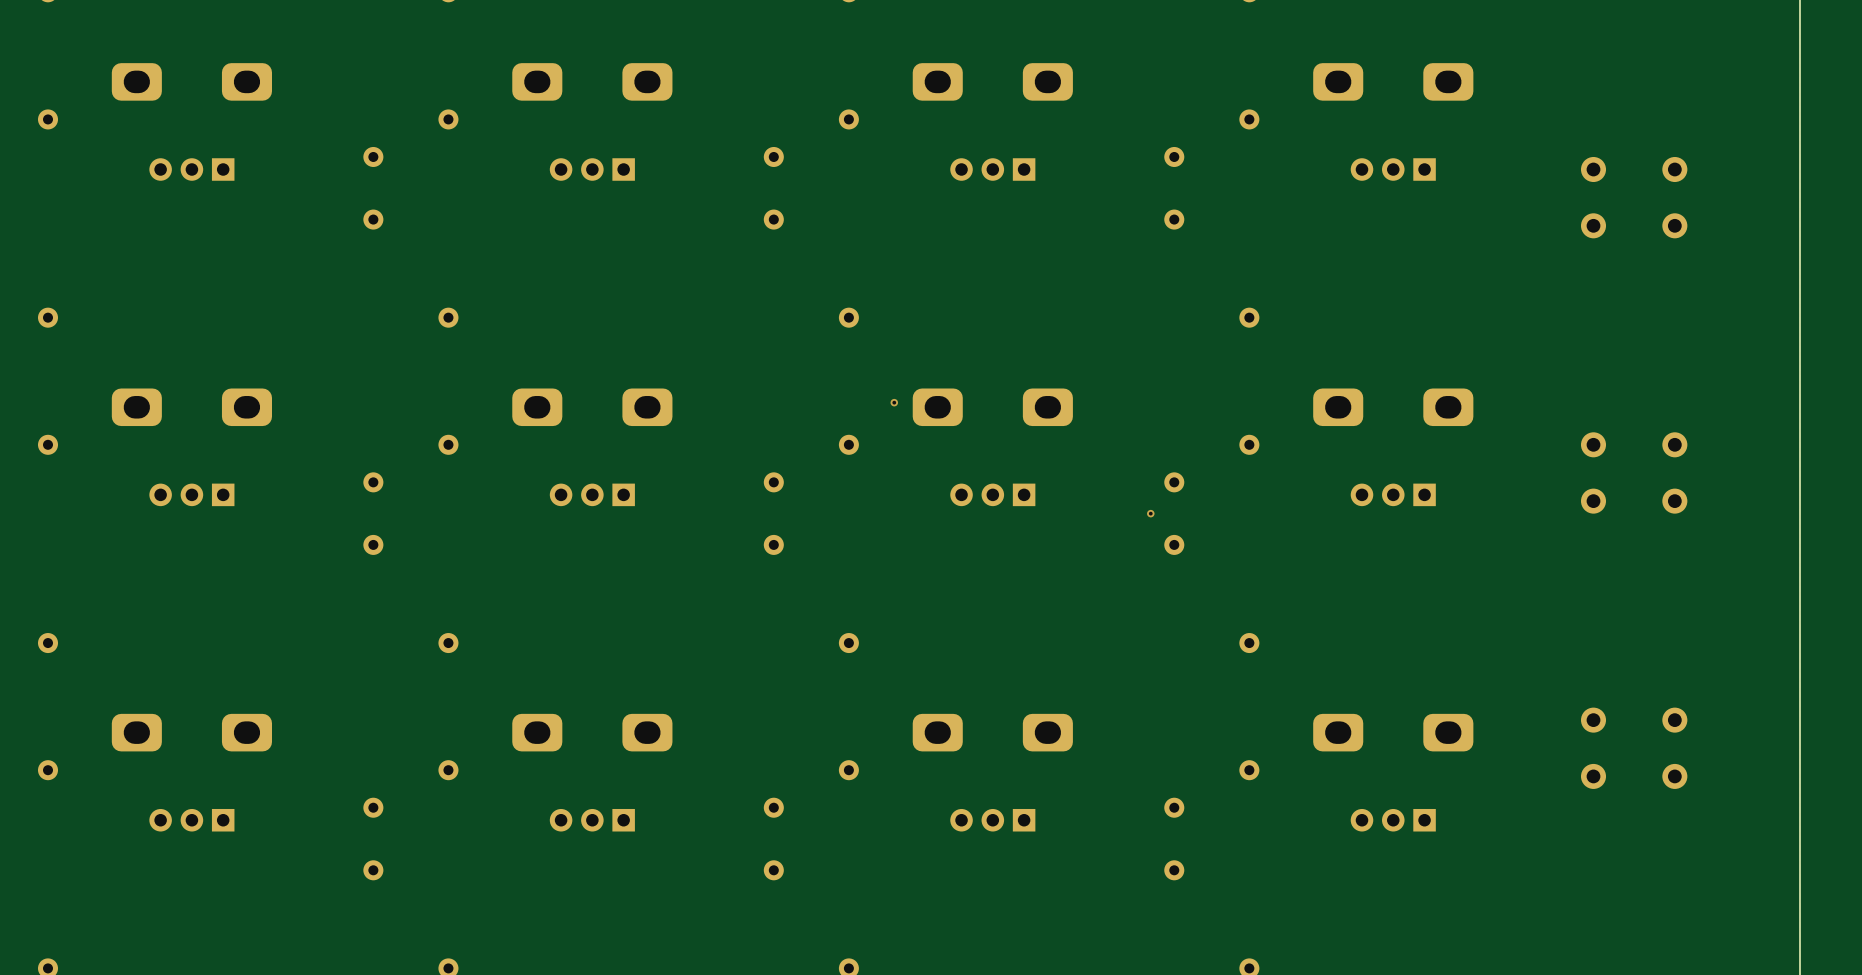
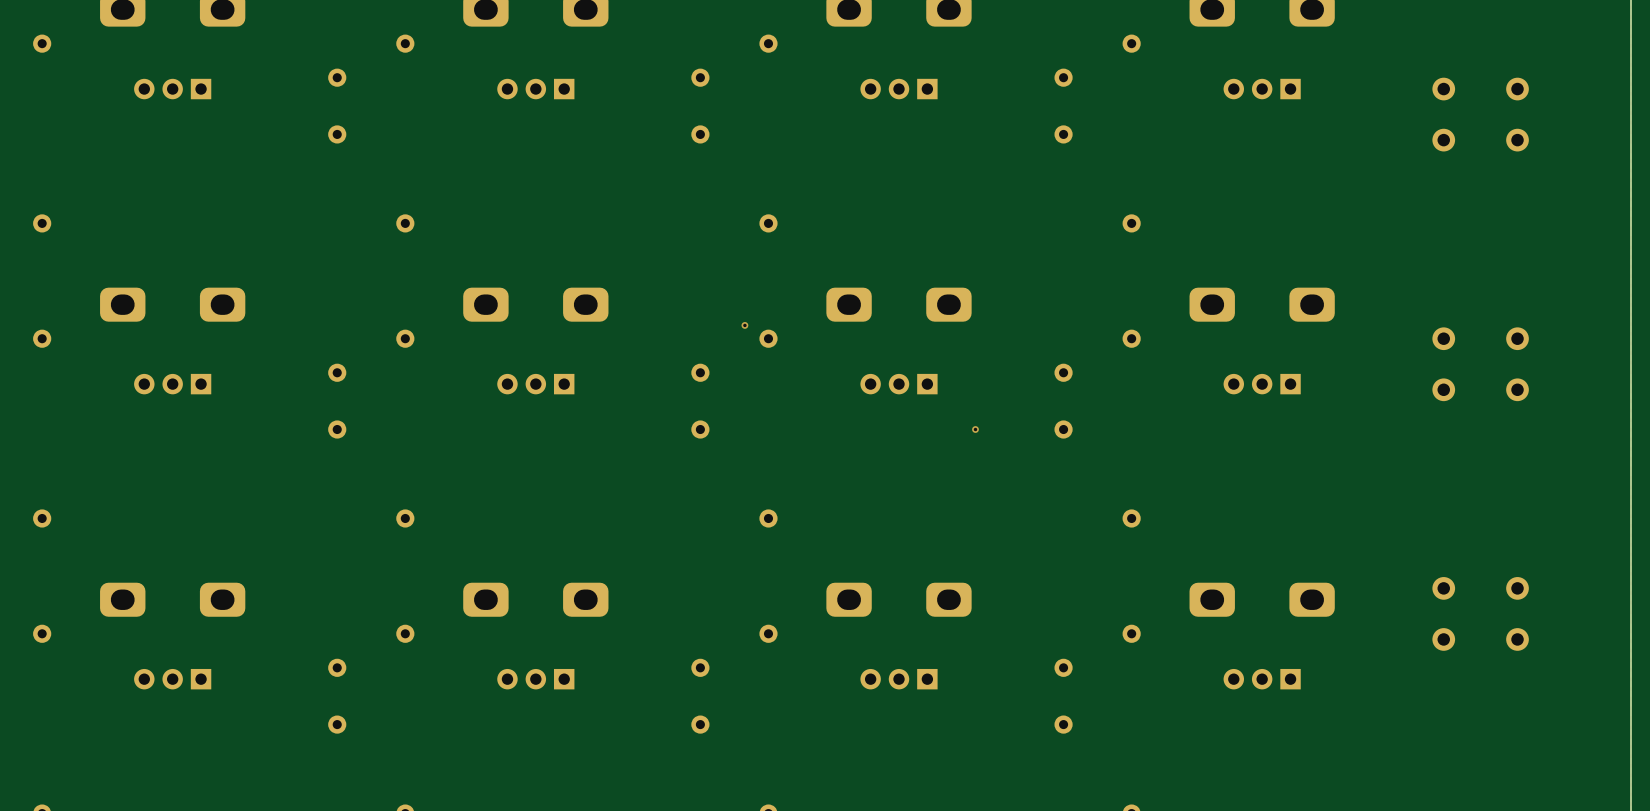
via: (894, 402) -> none
via: none -> (744, 325)
via: (1150, 513) -> none
via: none -> (975, 429)

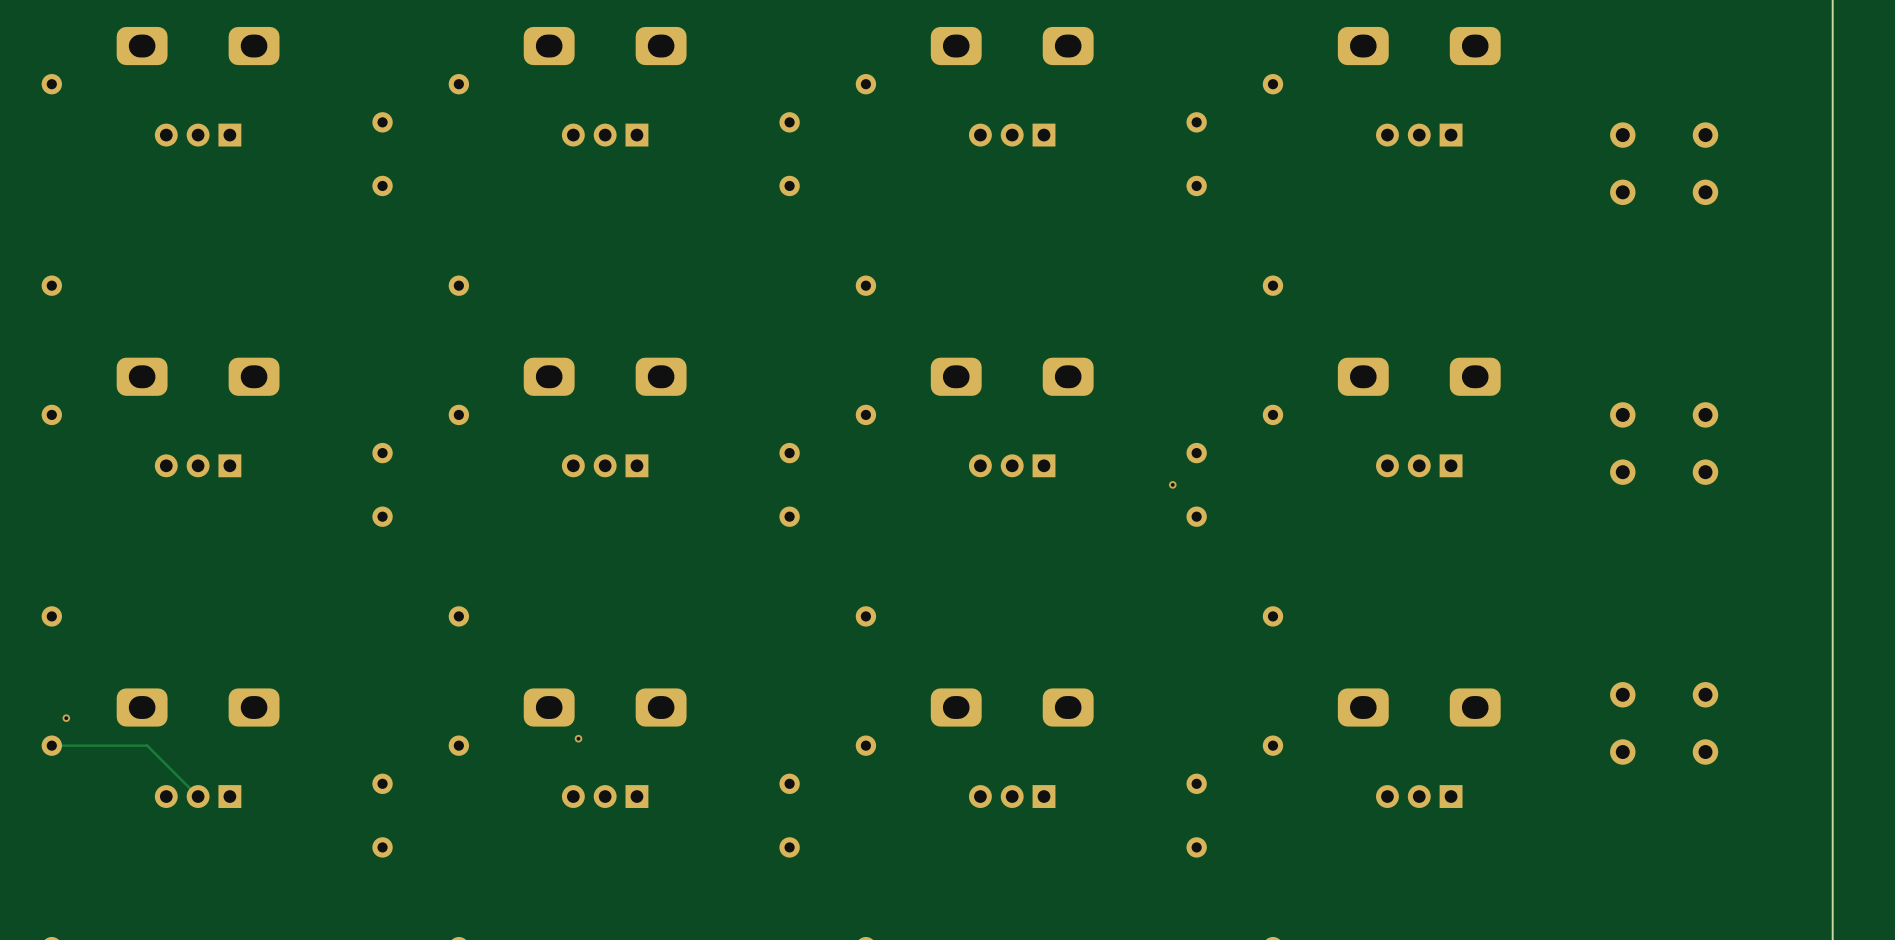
via: (744, 325) -> none
via: none -> (1172, 484)
via: (975, 429) -> none
via: none -> (66, 718)
via: none -> (578, 738)
track: none -> (51, 745) (147, 745) (198, 796)

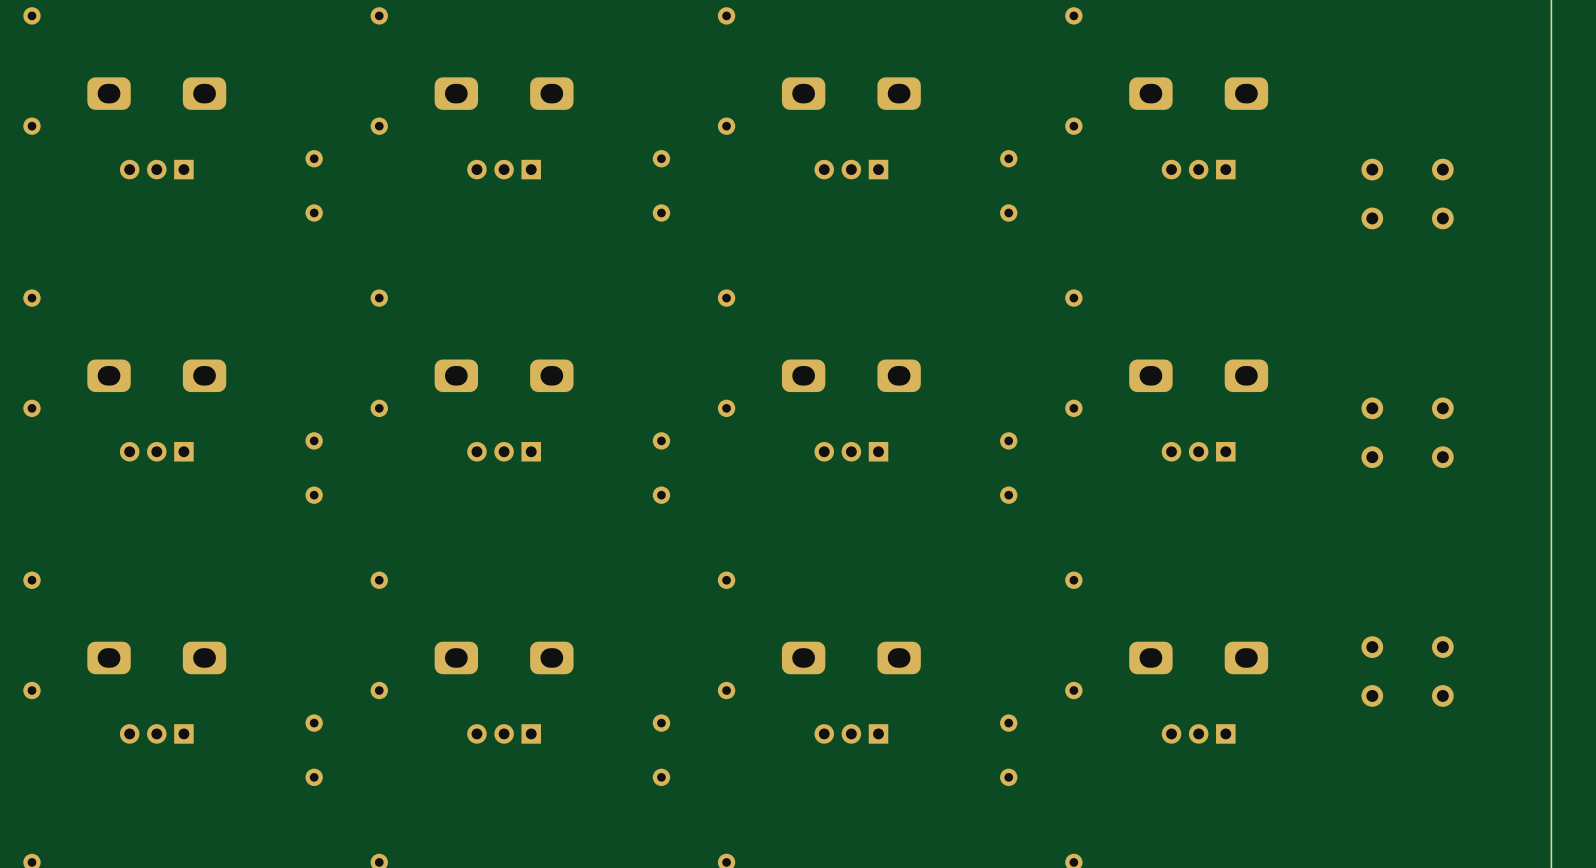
via: (1172, 484) -> none
via: (66, 718) -> none
via: (578, 738) -> none
track: (51, 745) (147, 745) (198, 796) -> none

